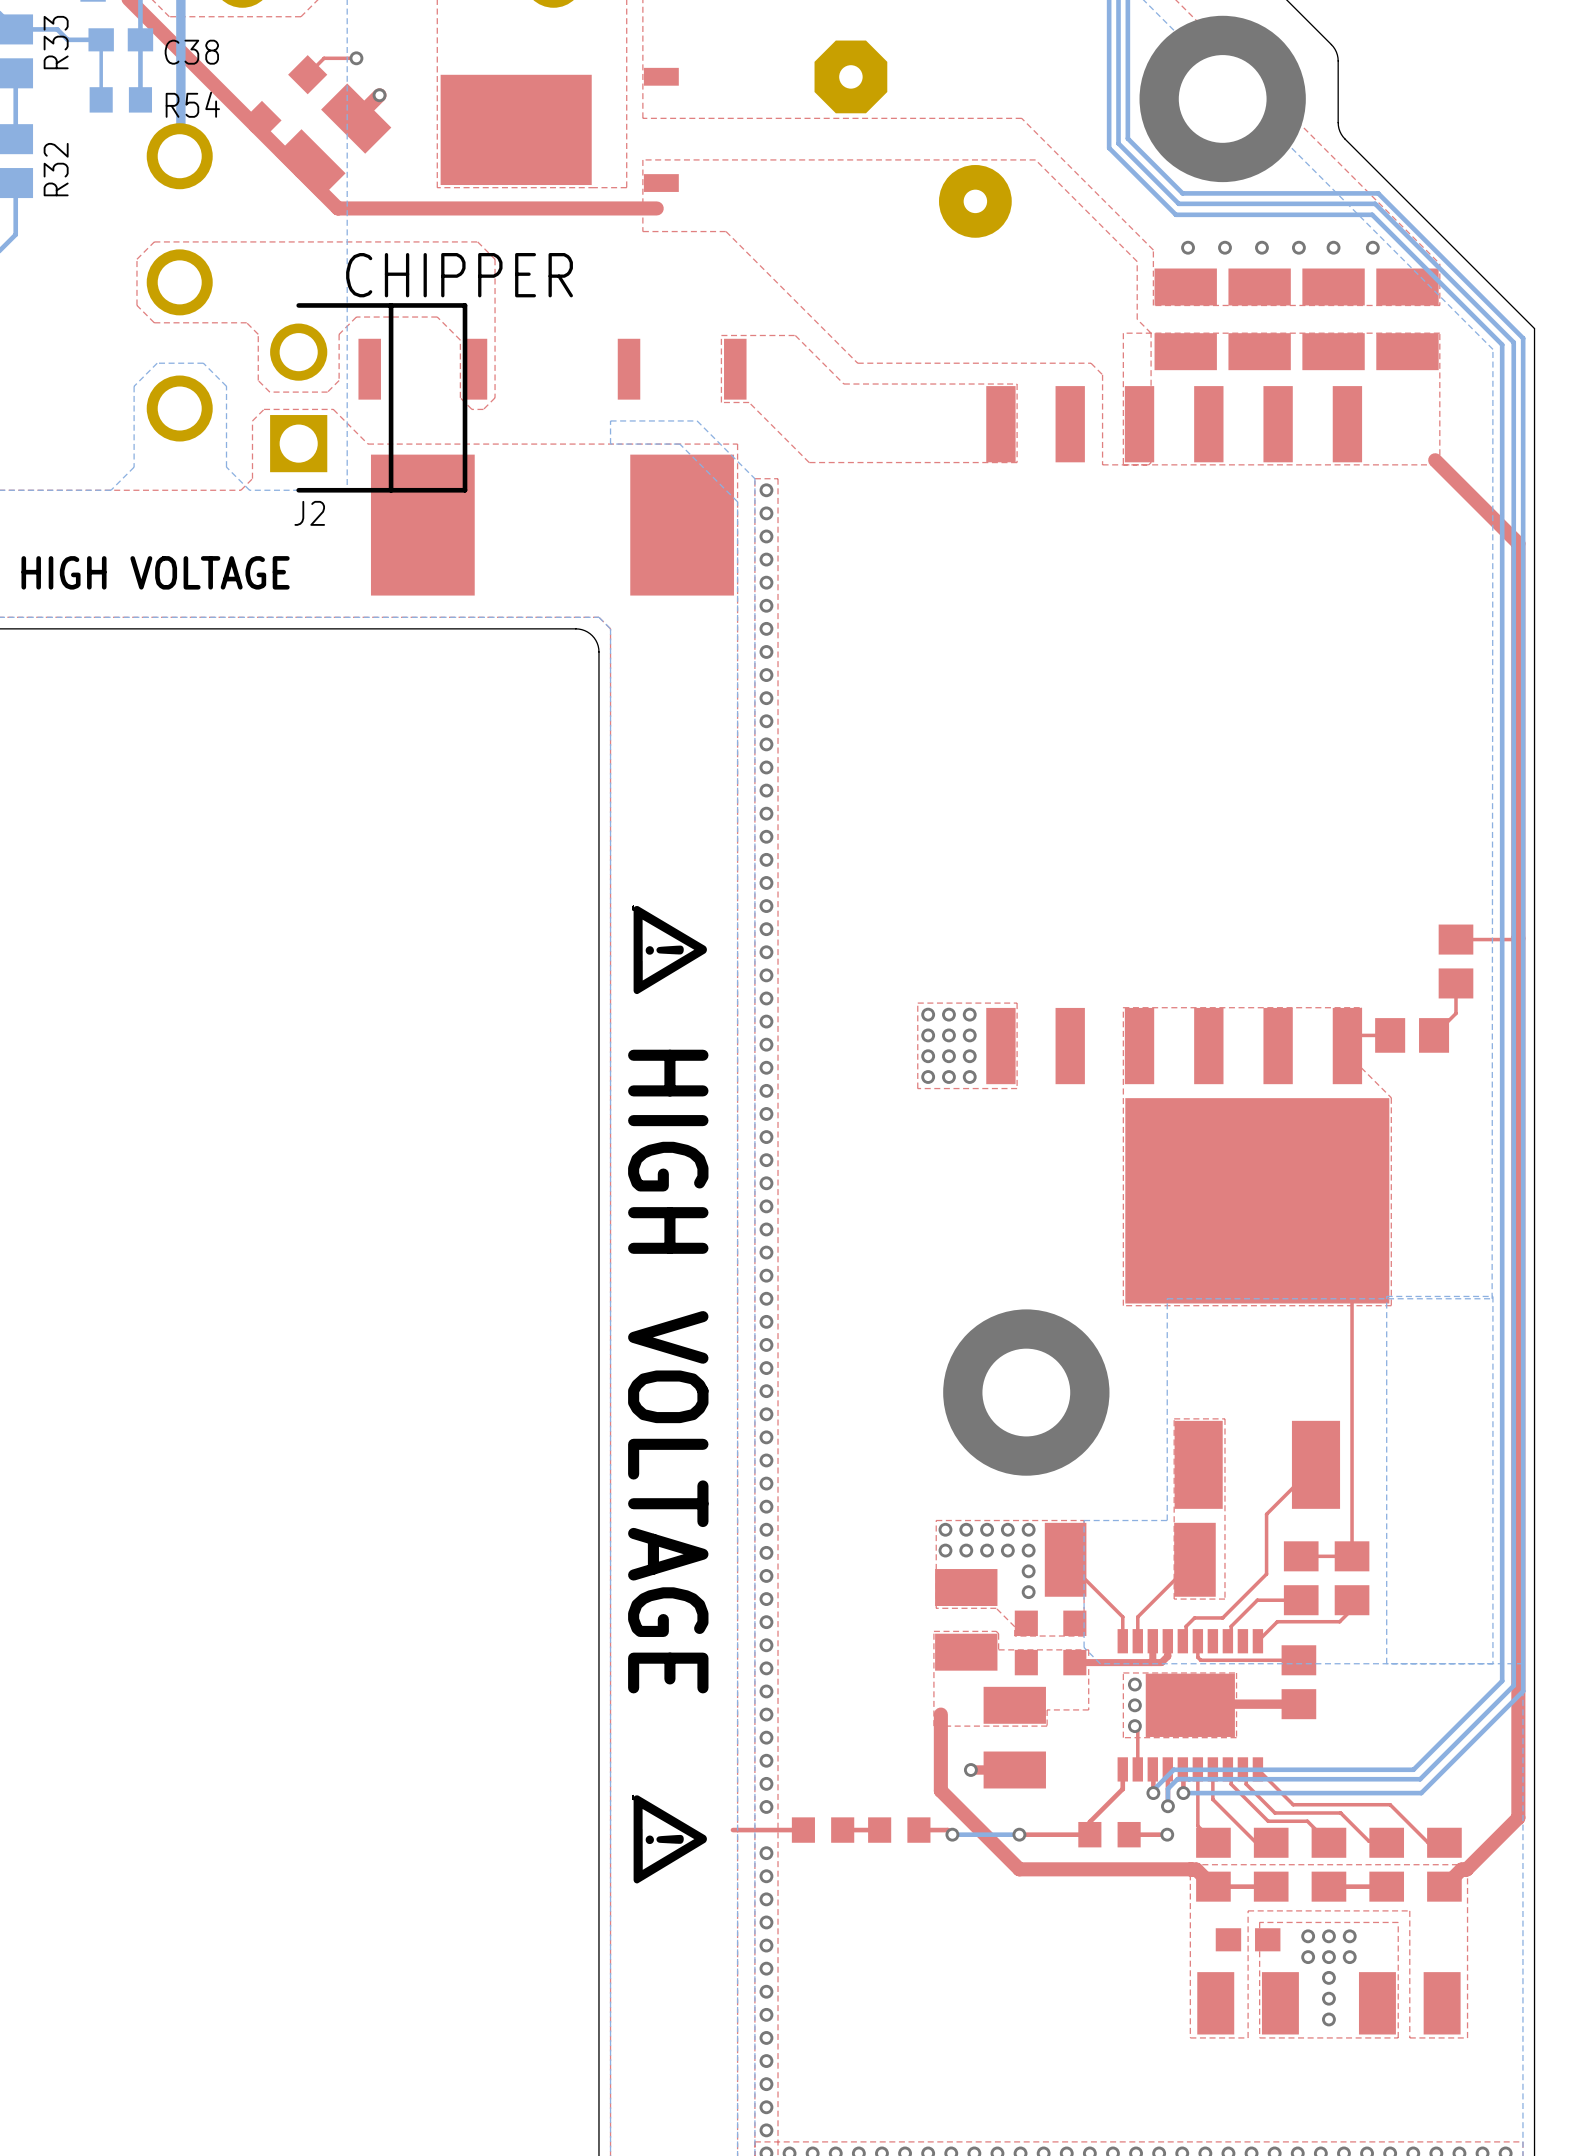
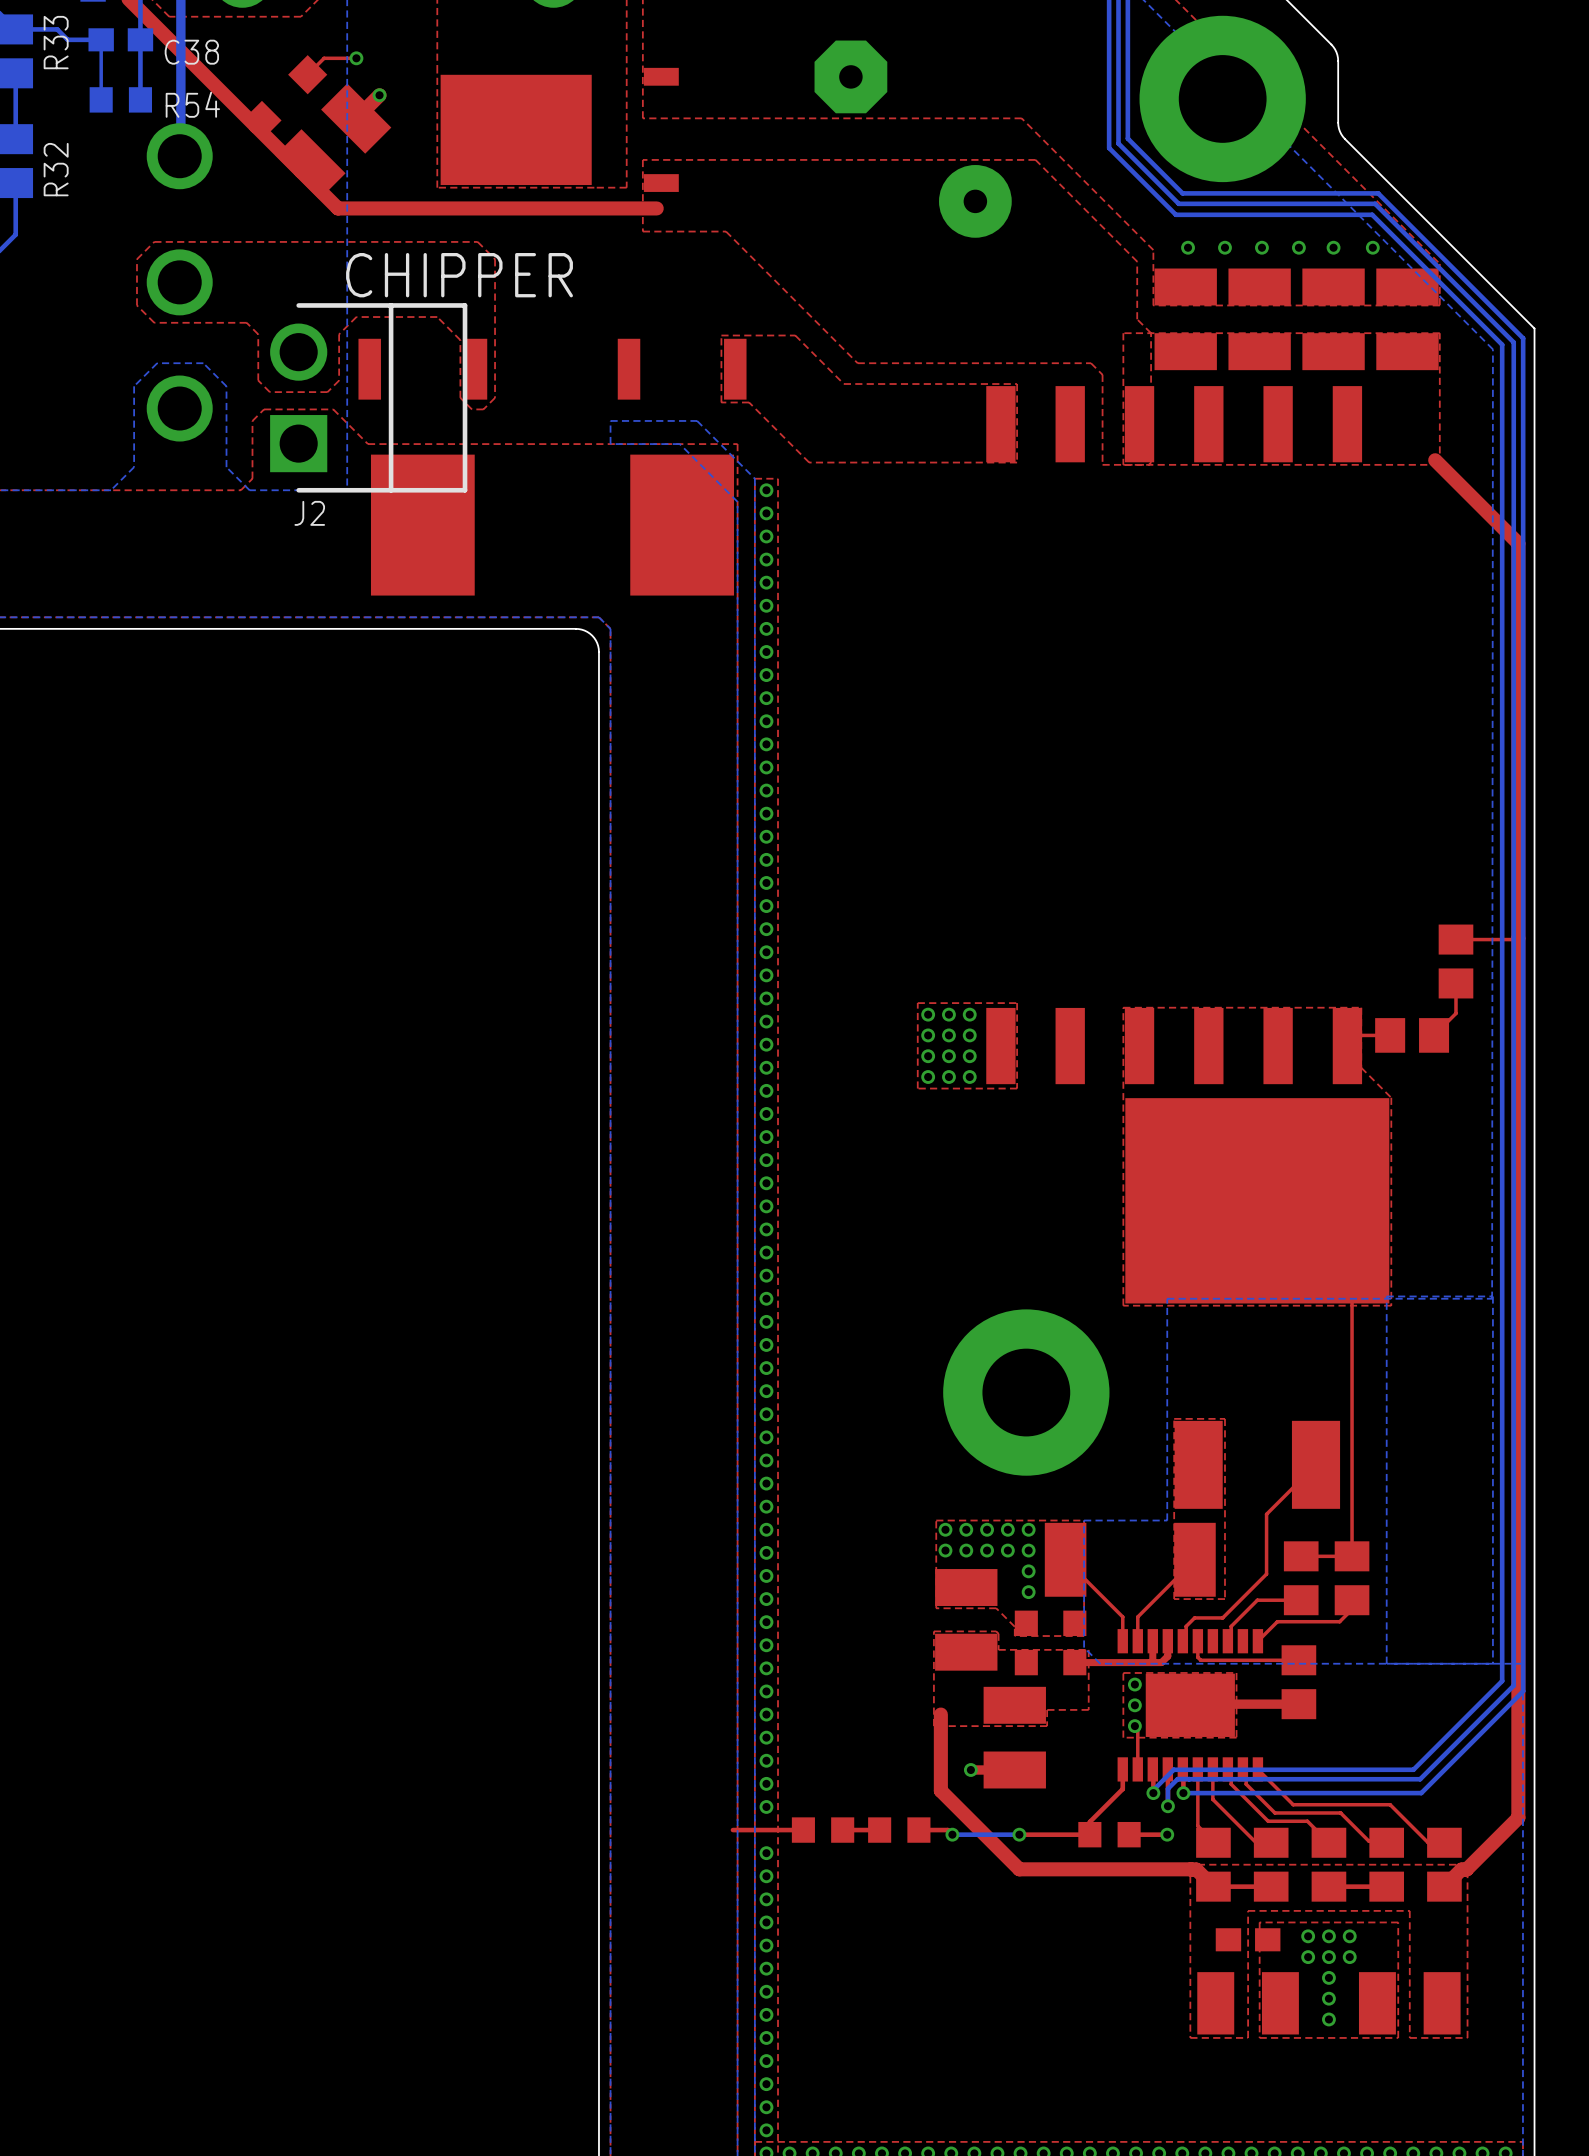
text: HIGH VOLTAGE (155, 572) -> none
drawing: [633, 906, 707, 995] -> none
text: HIGH VOLTAGE (668, 1371) -> none
drawing: [633, 1795, 707, 1884] -> none

